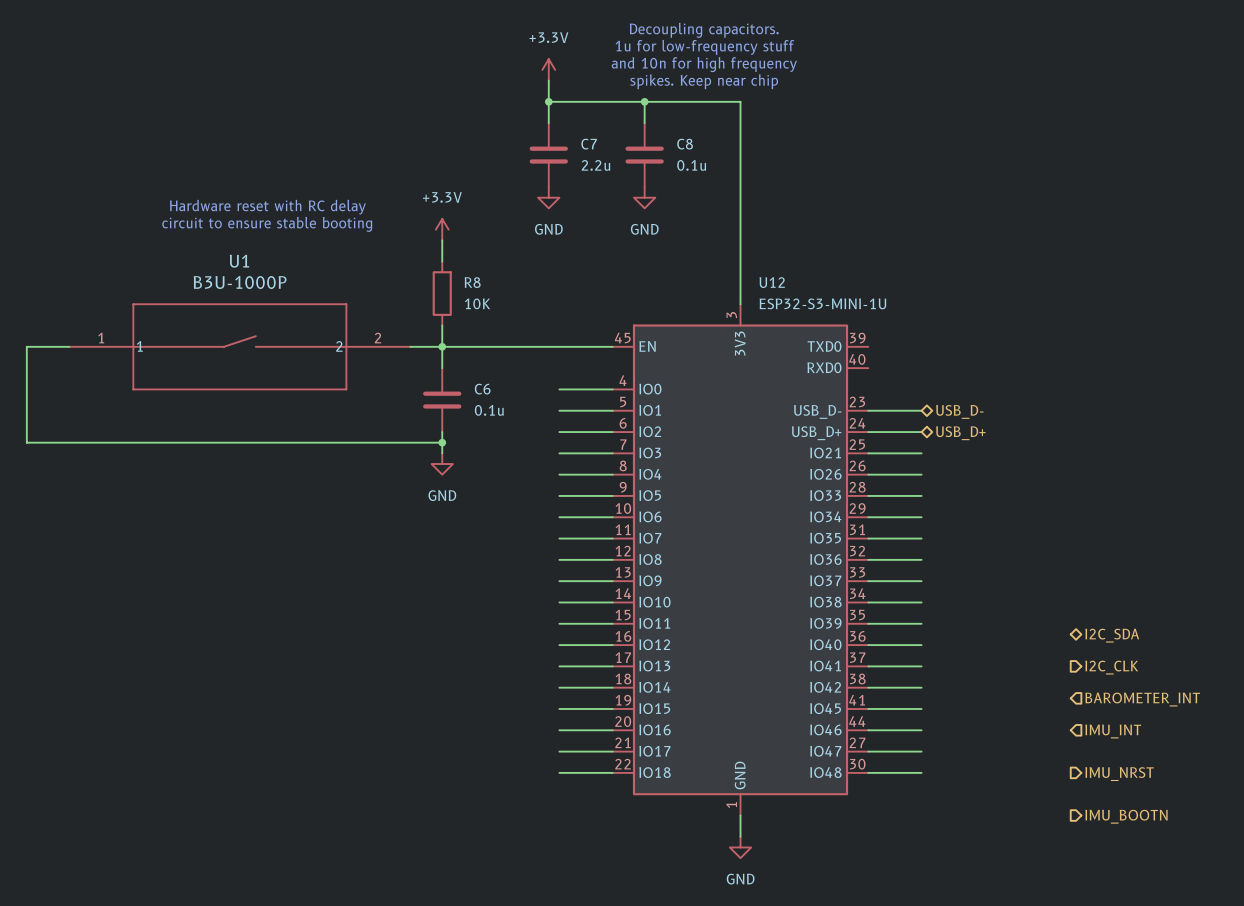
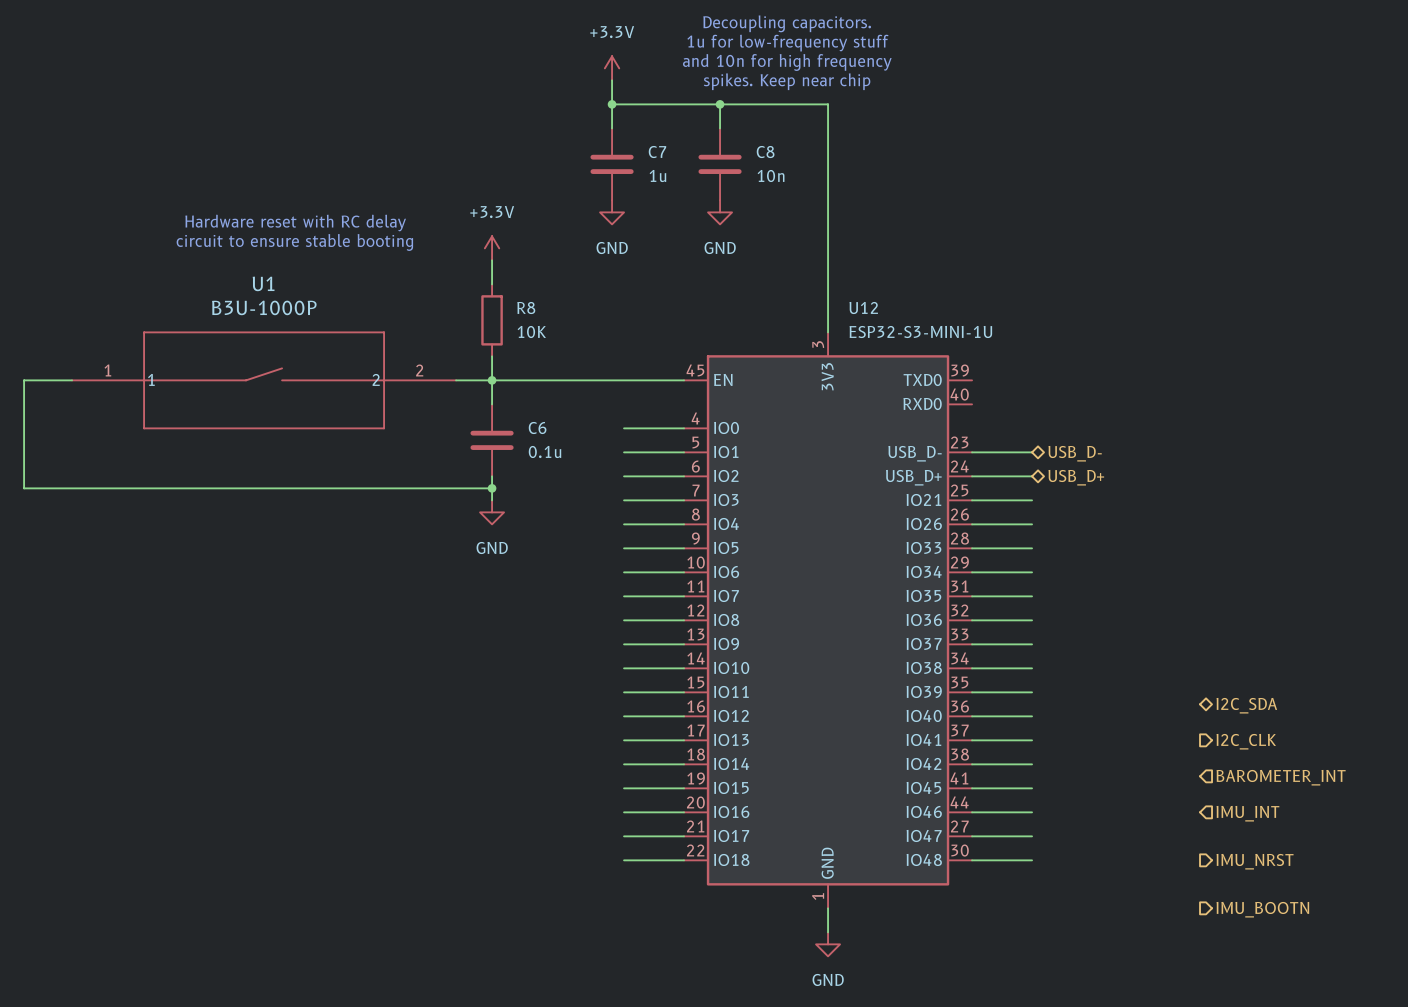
C7 value: 2.2u (595, 165) -> 1u (657, 176)
C8 value: 0.1u (691, 165) -> 10n (771, 176)

